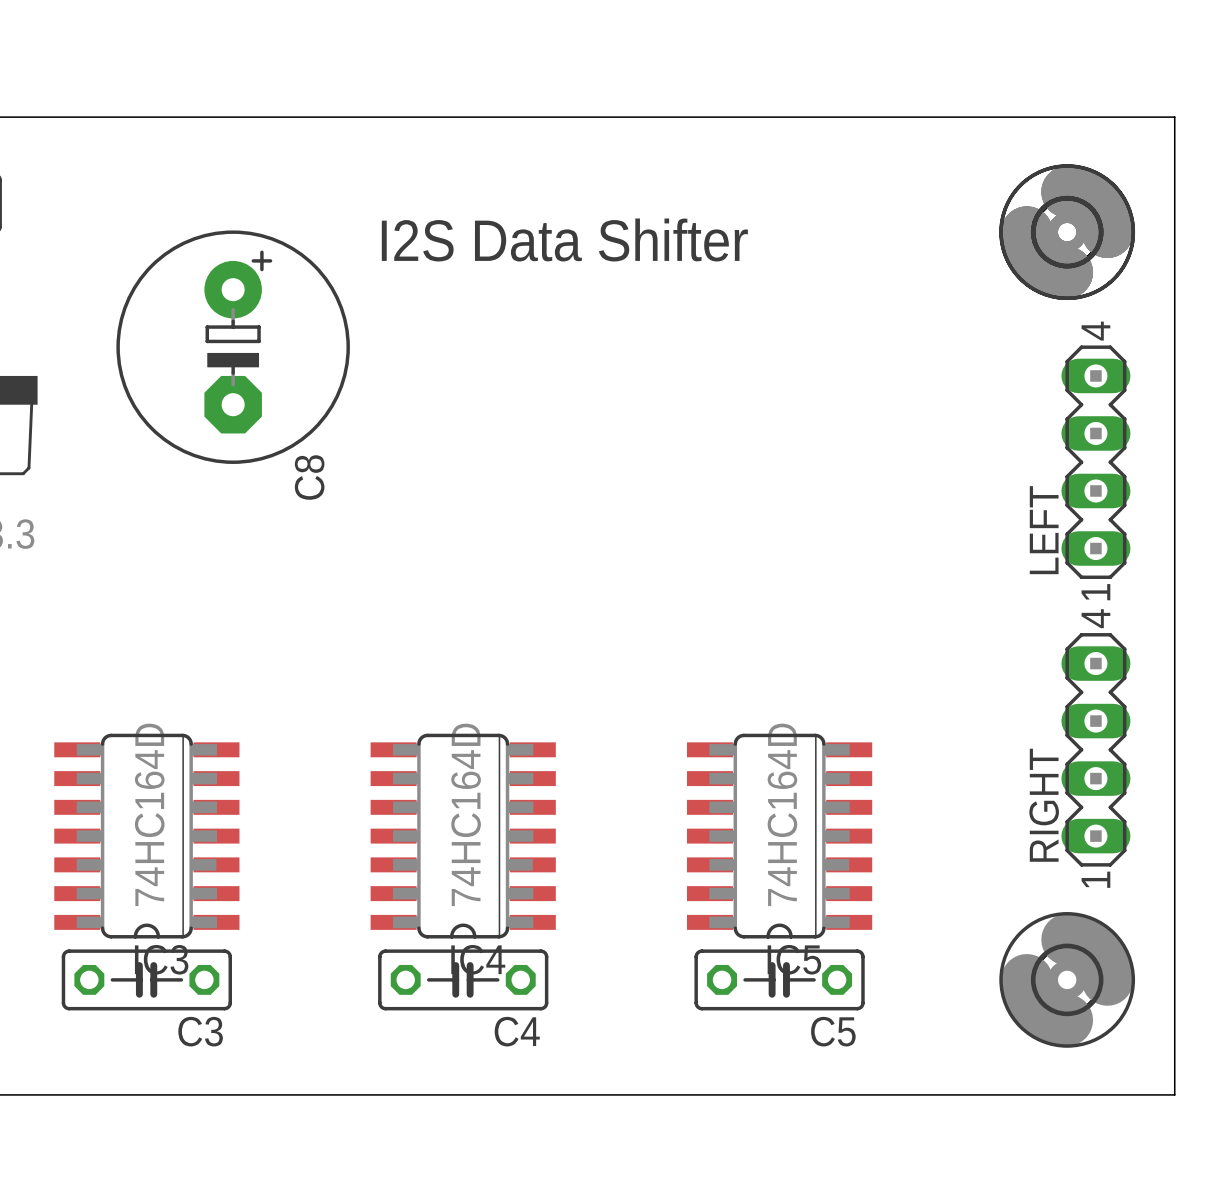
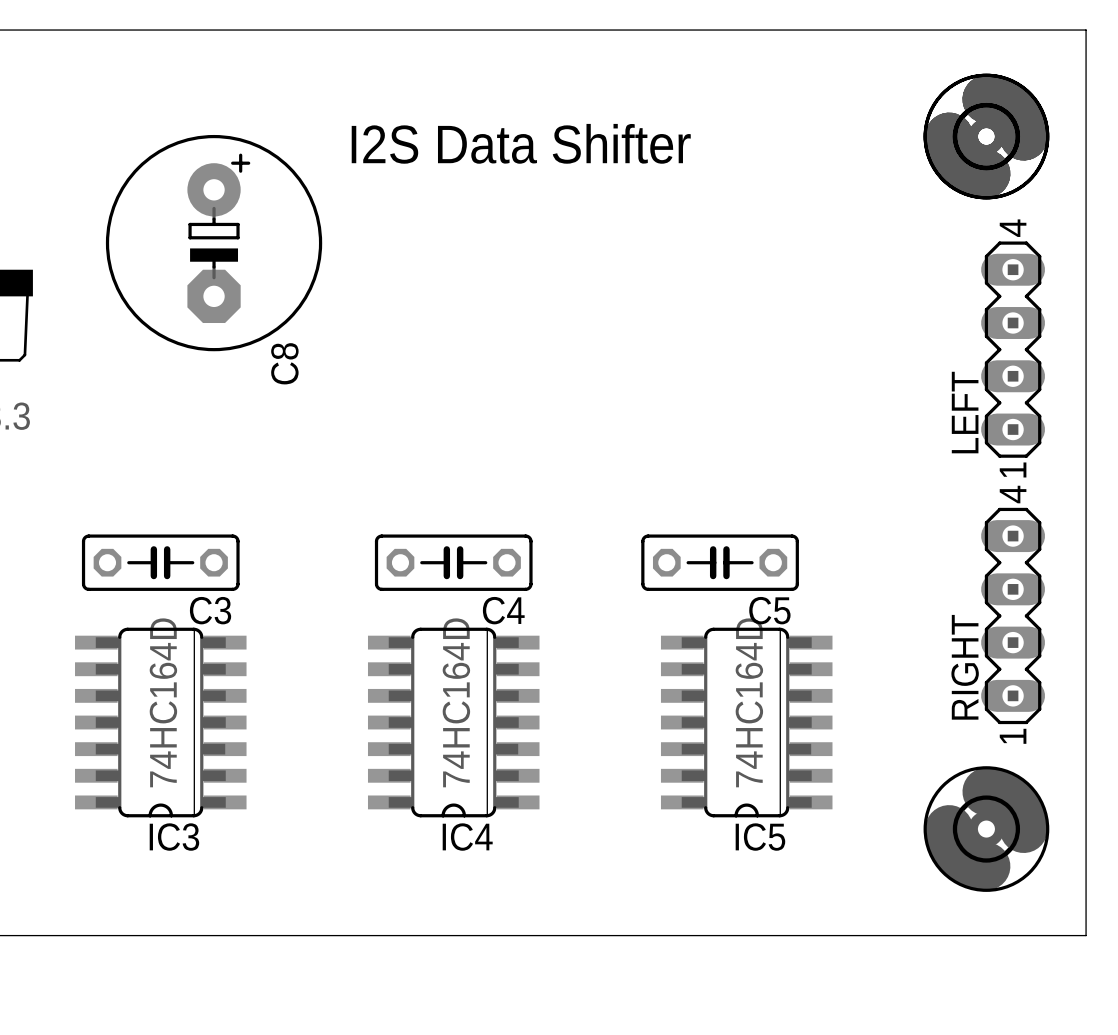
IC3 position: (146, 836) -> (160, 722)
IC4 position: (463, 836) -> (453, 722)
IC5 position: (779, 836) -> (746, 722)
C3 position: (146, 979) -> (160, 562)
C4 position: (463, 979) -> (453, 562)
C5 position: (779, 979) -> (720, 562)

